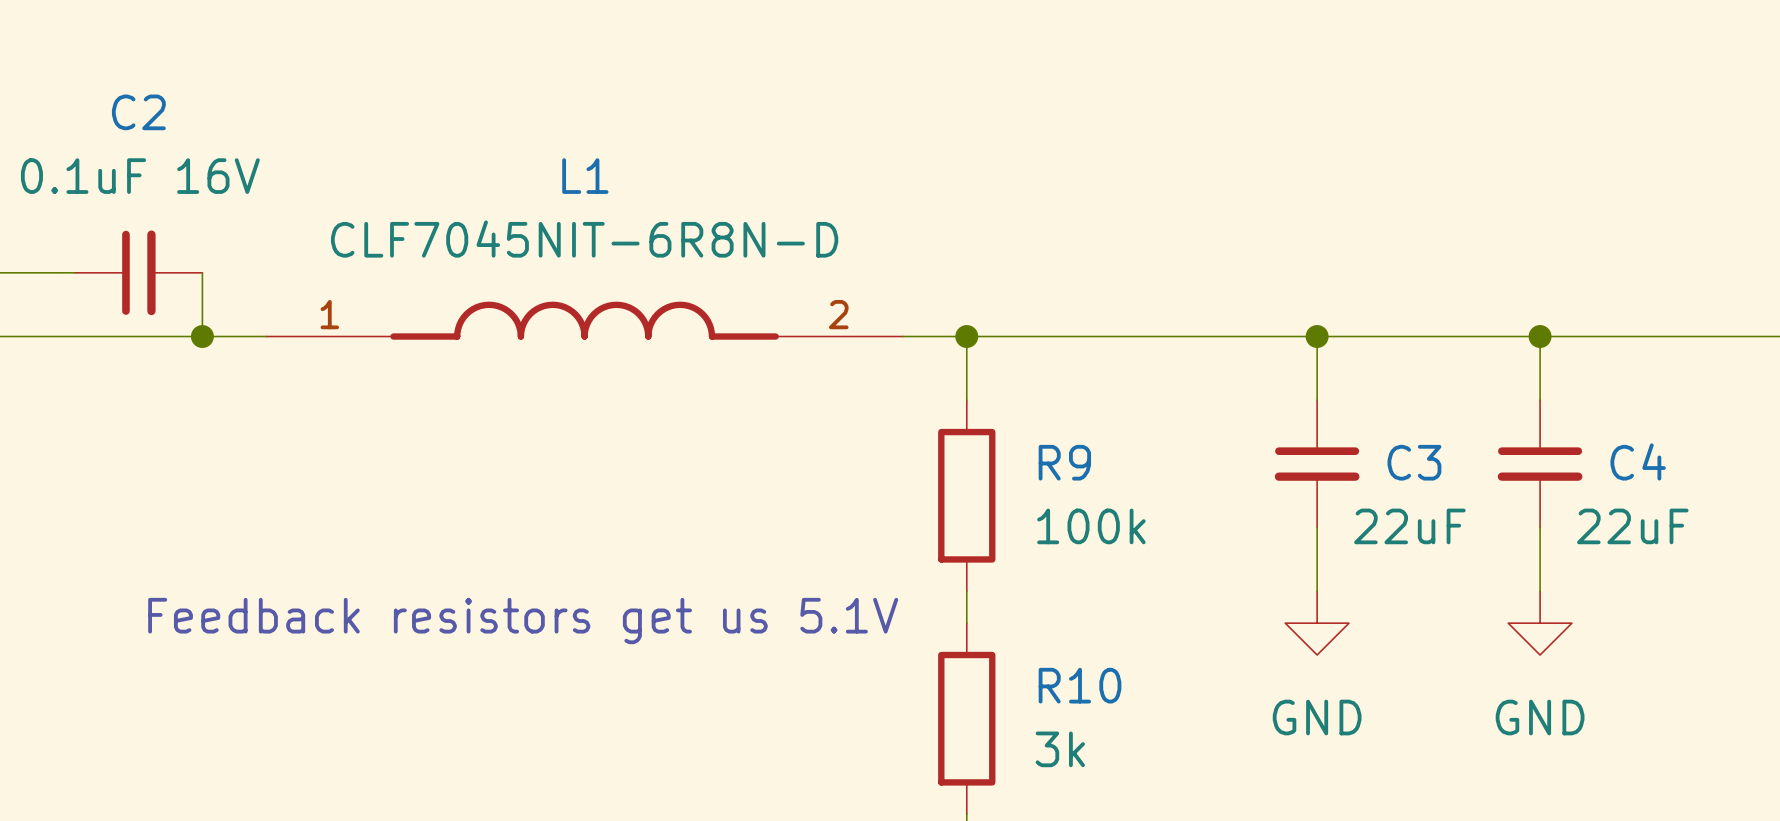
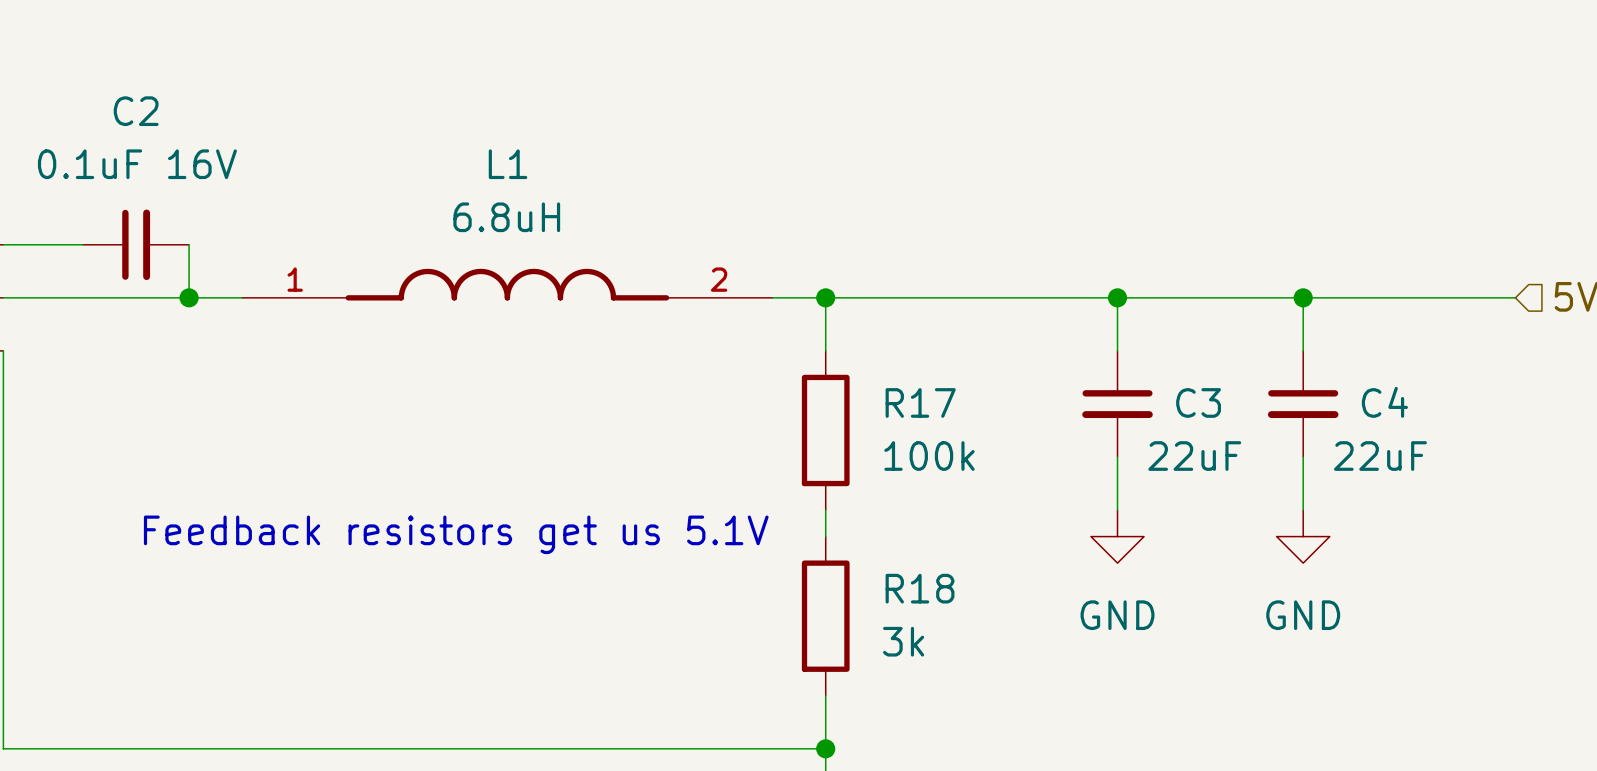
L1 value: CLF7045NIT-6R8N-D (584, 239) -> 6.8uH (506, 217)
R9 name: R9 (1064, 462) -> R17 (920, 402)
R10 name: R10 (1080, 685) -> R18 (920, 588)

